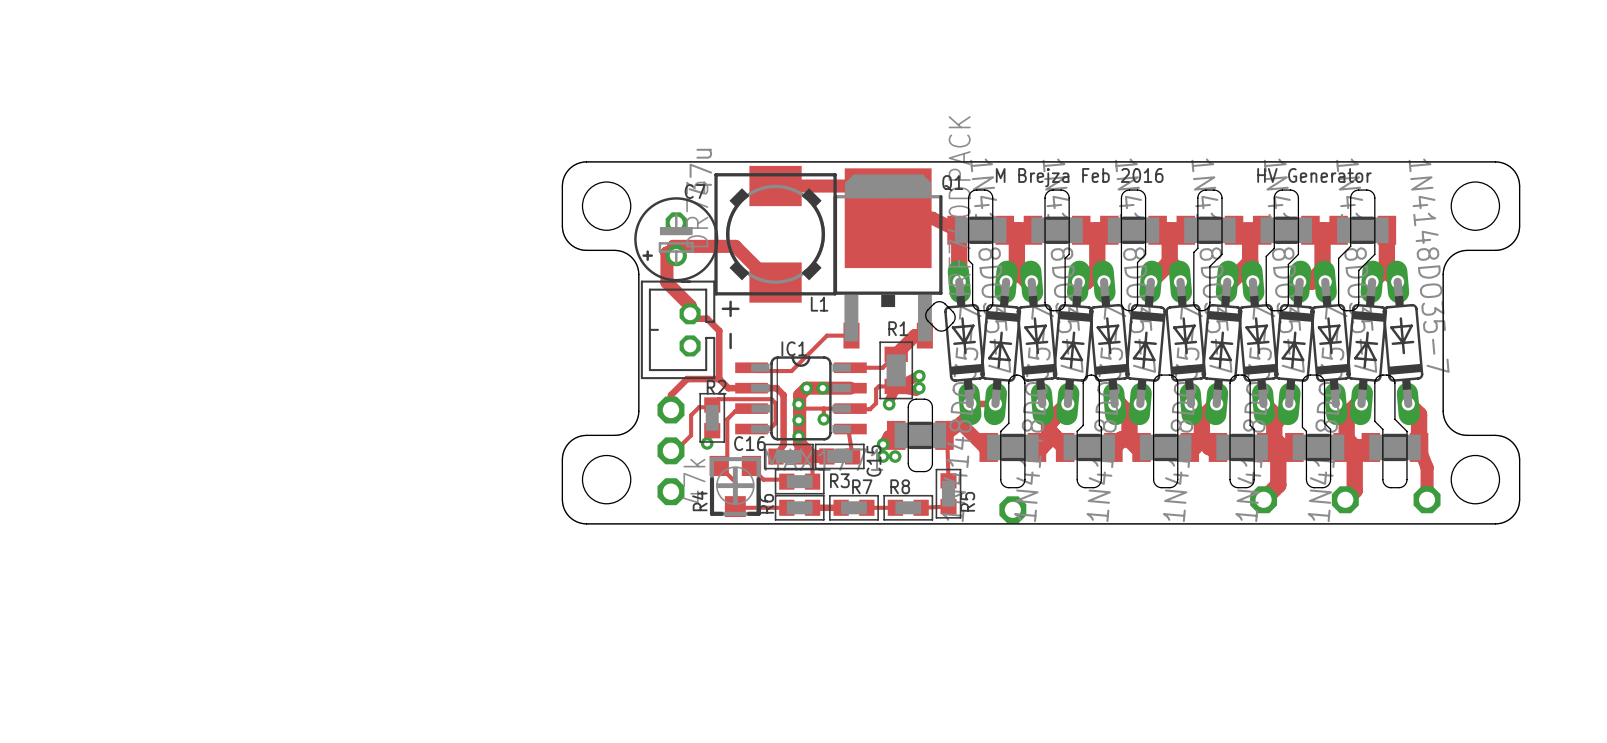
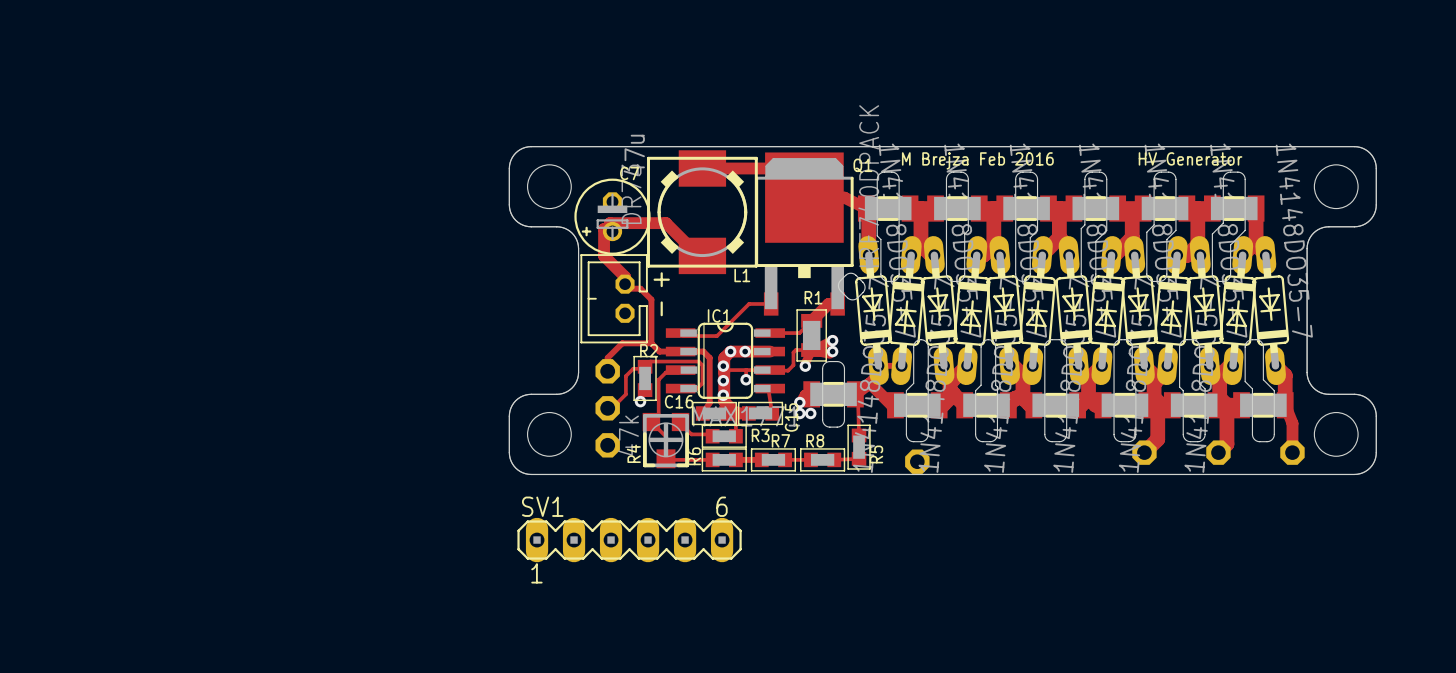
SV1: none -> (629, 540)

